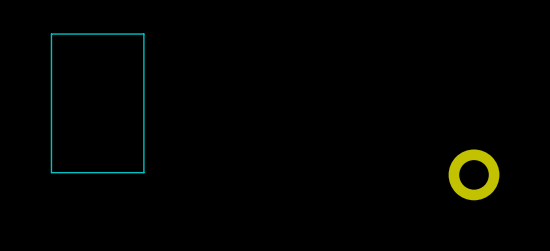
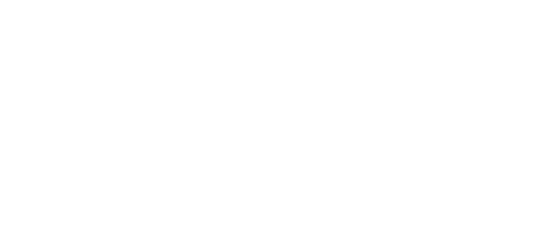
line: (51, 34) (143, 34) (143, 172) (51, 172) (51, 34) -> none
part: (474, 174) -> none

